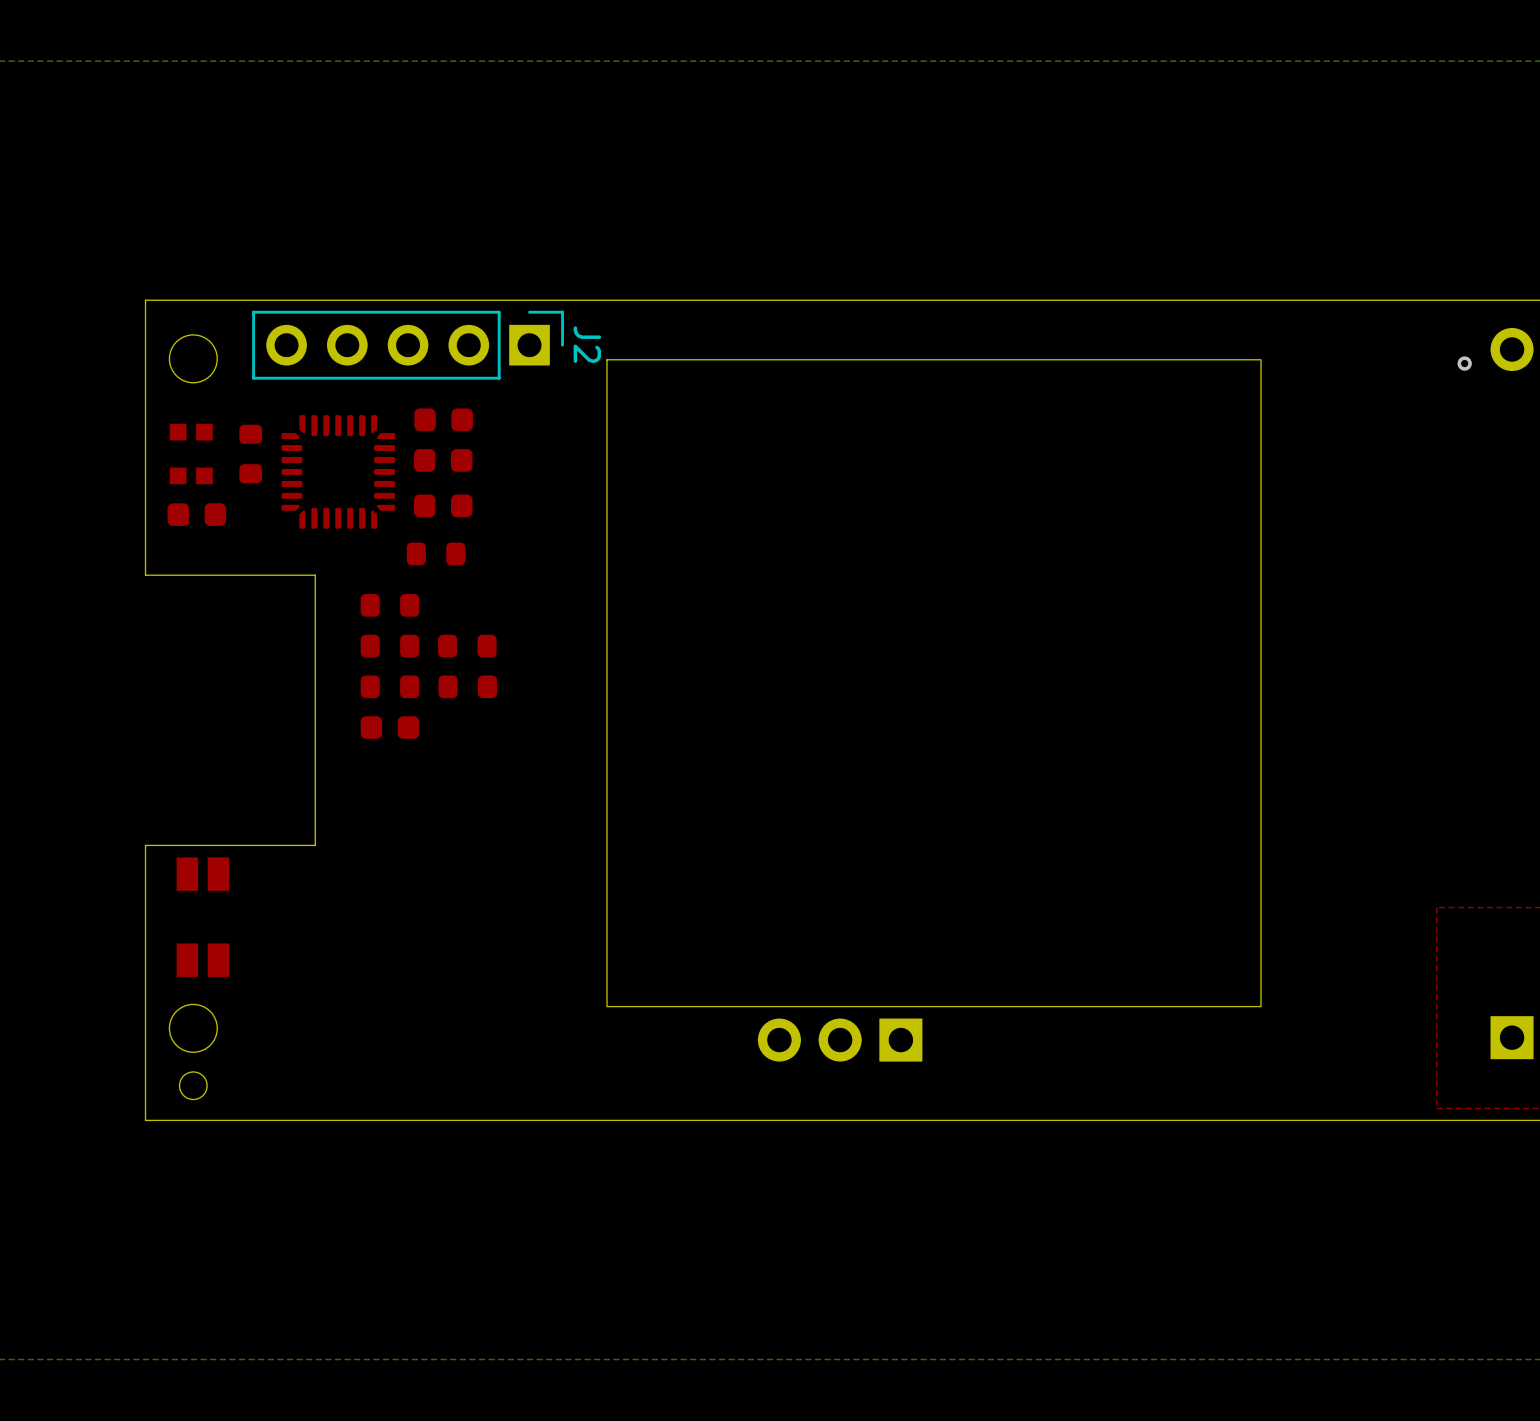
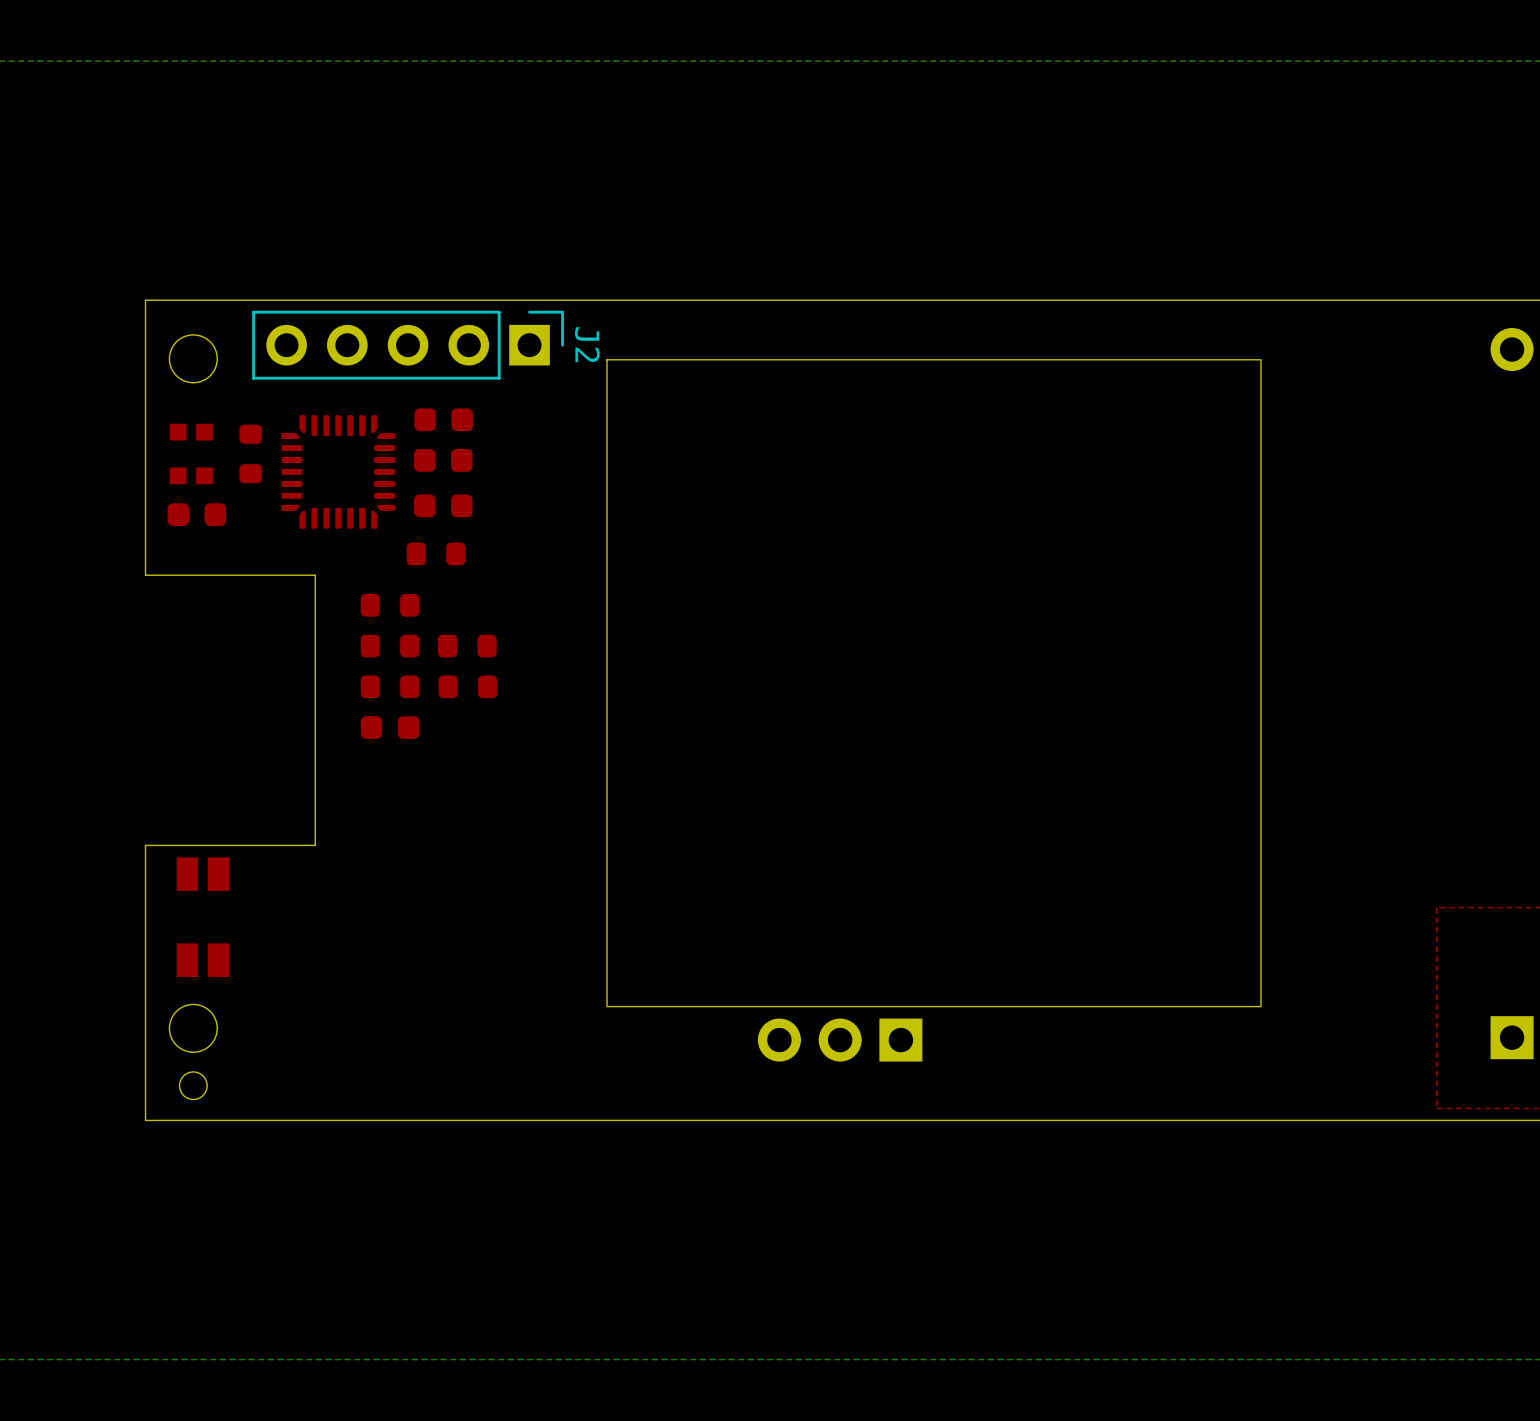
via: (1464, 363) -> none

